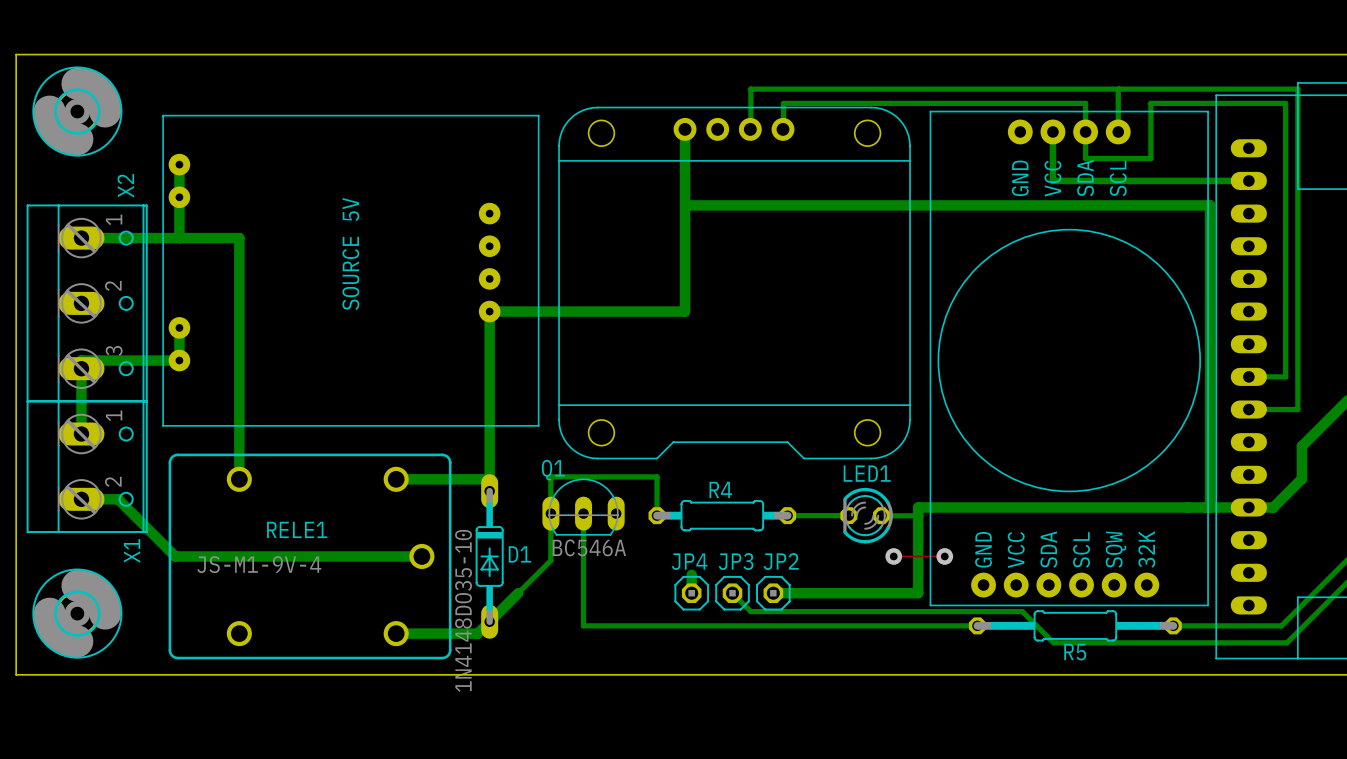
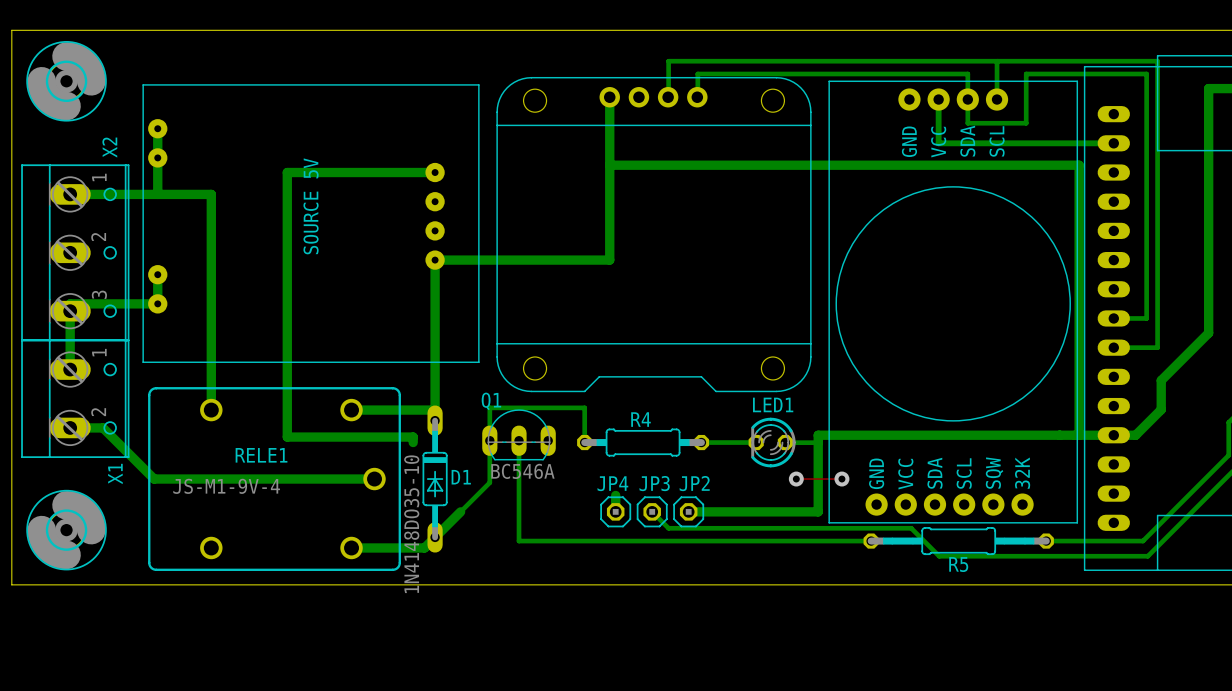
bottom track: none -> (435, 172) (287, 172) (287, 437) (413, 437) (413, 442)

